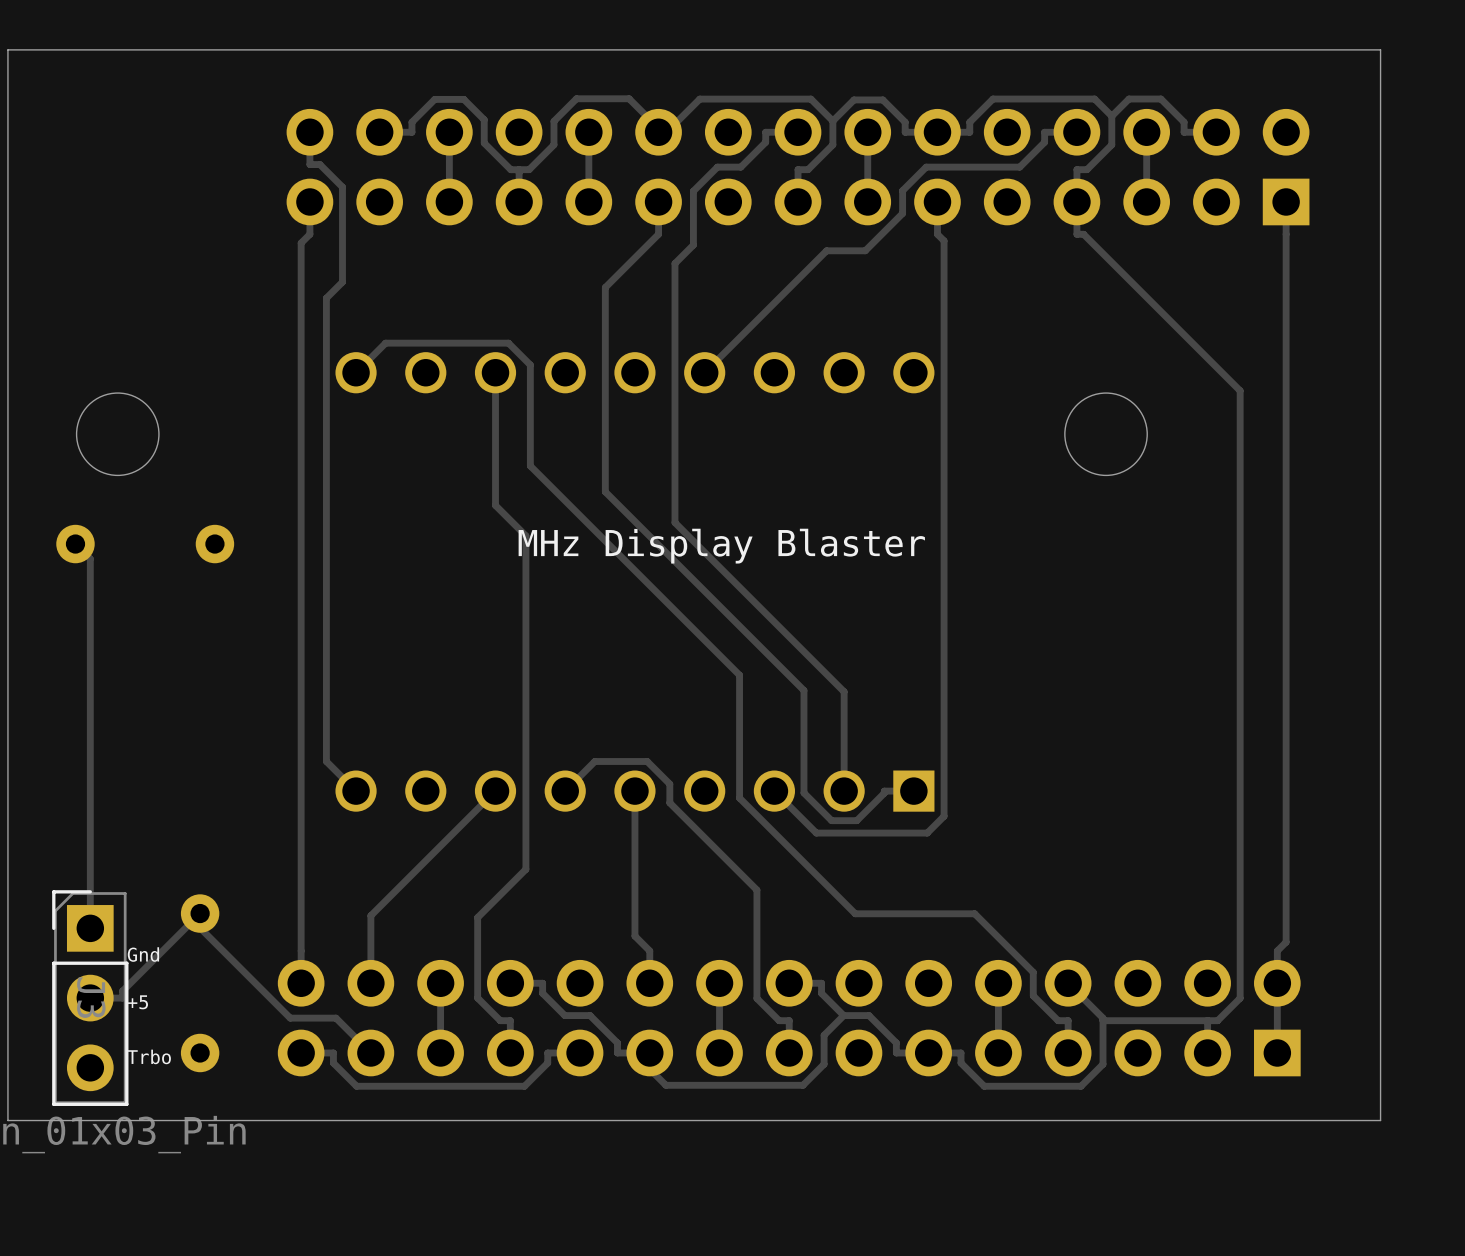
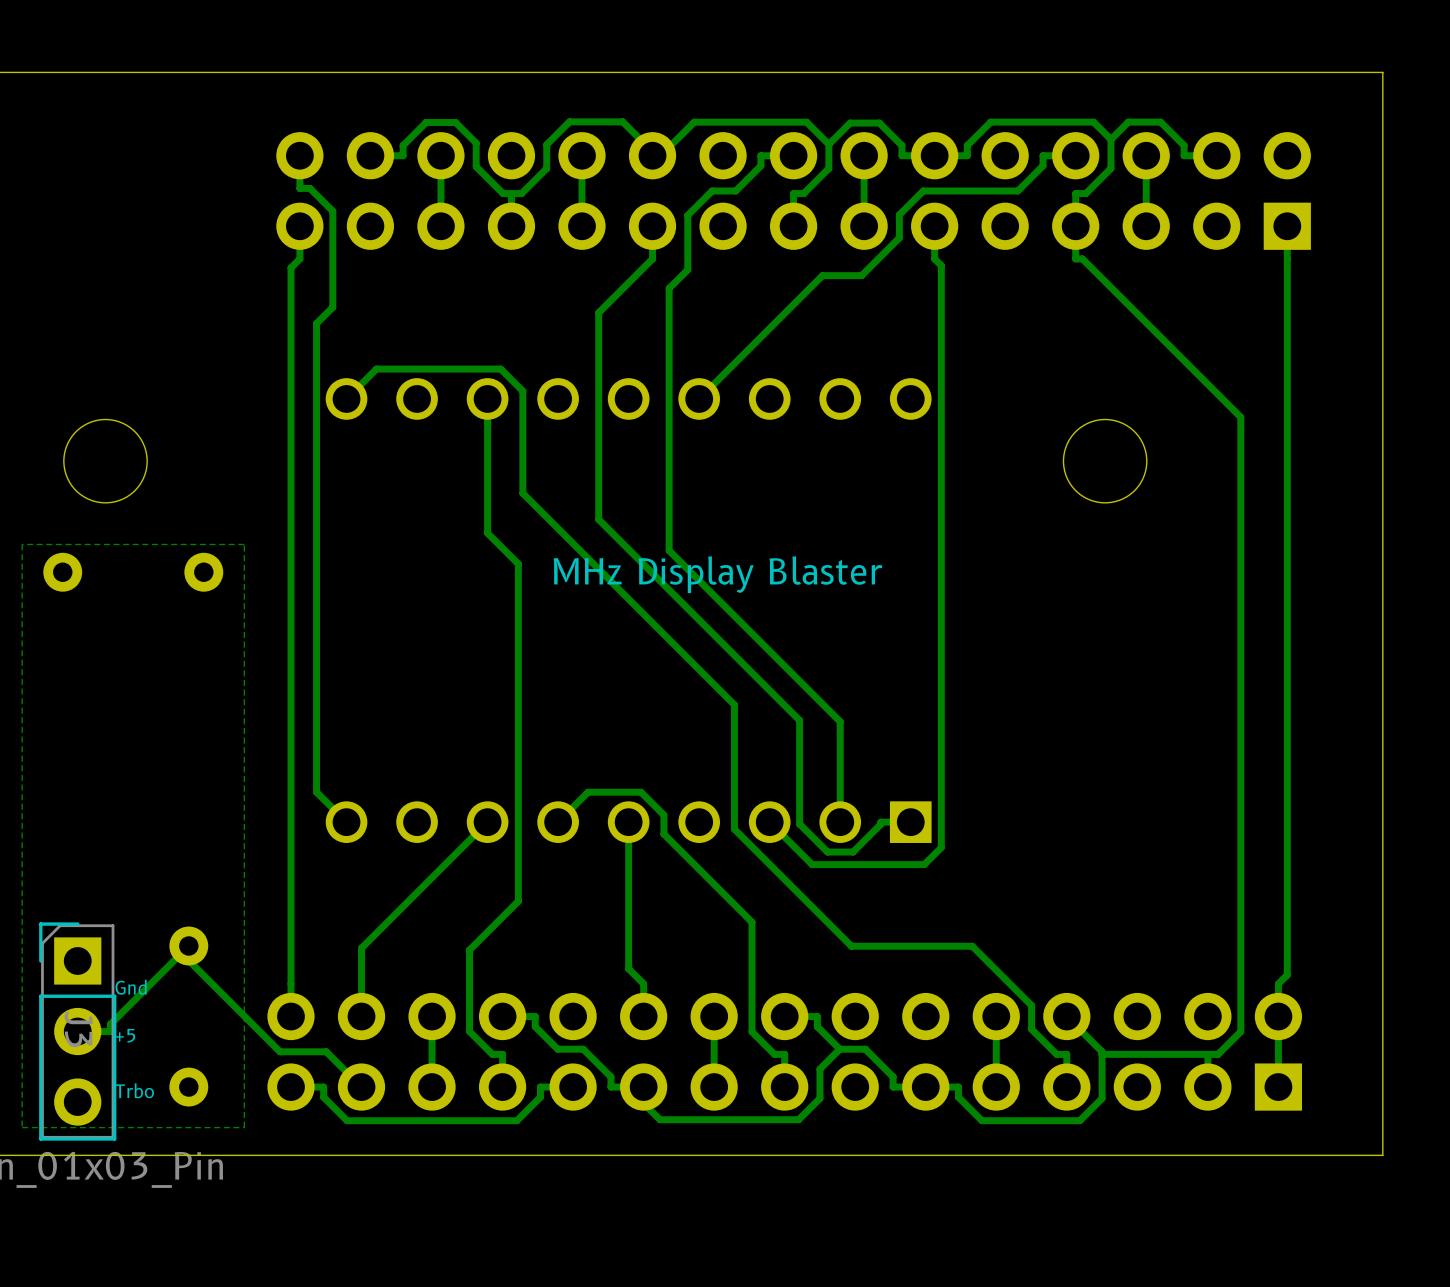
zone outline: none -> (244, 544) (22, 544) (22, 1127) (244, 1127) (244, 544)
track: (75, 544) (90, 558) (90, 928) -> none

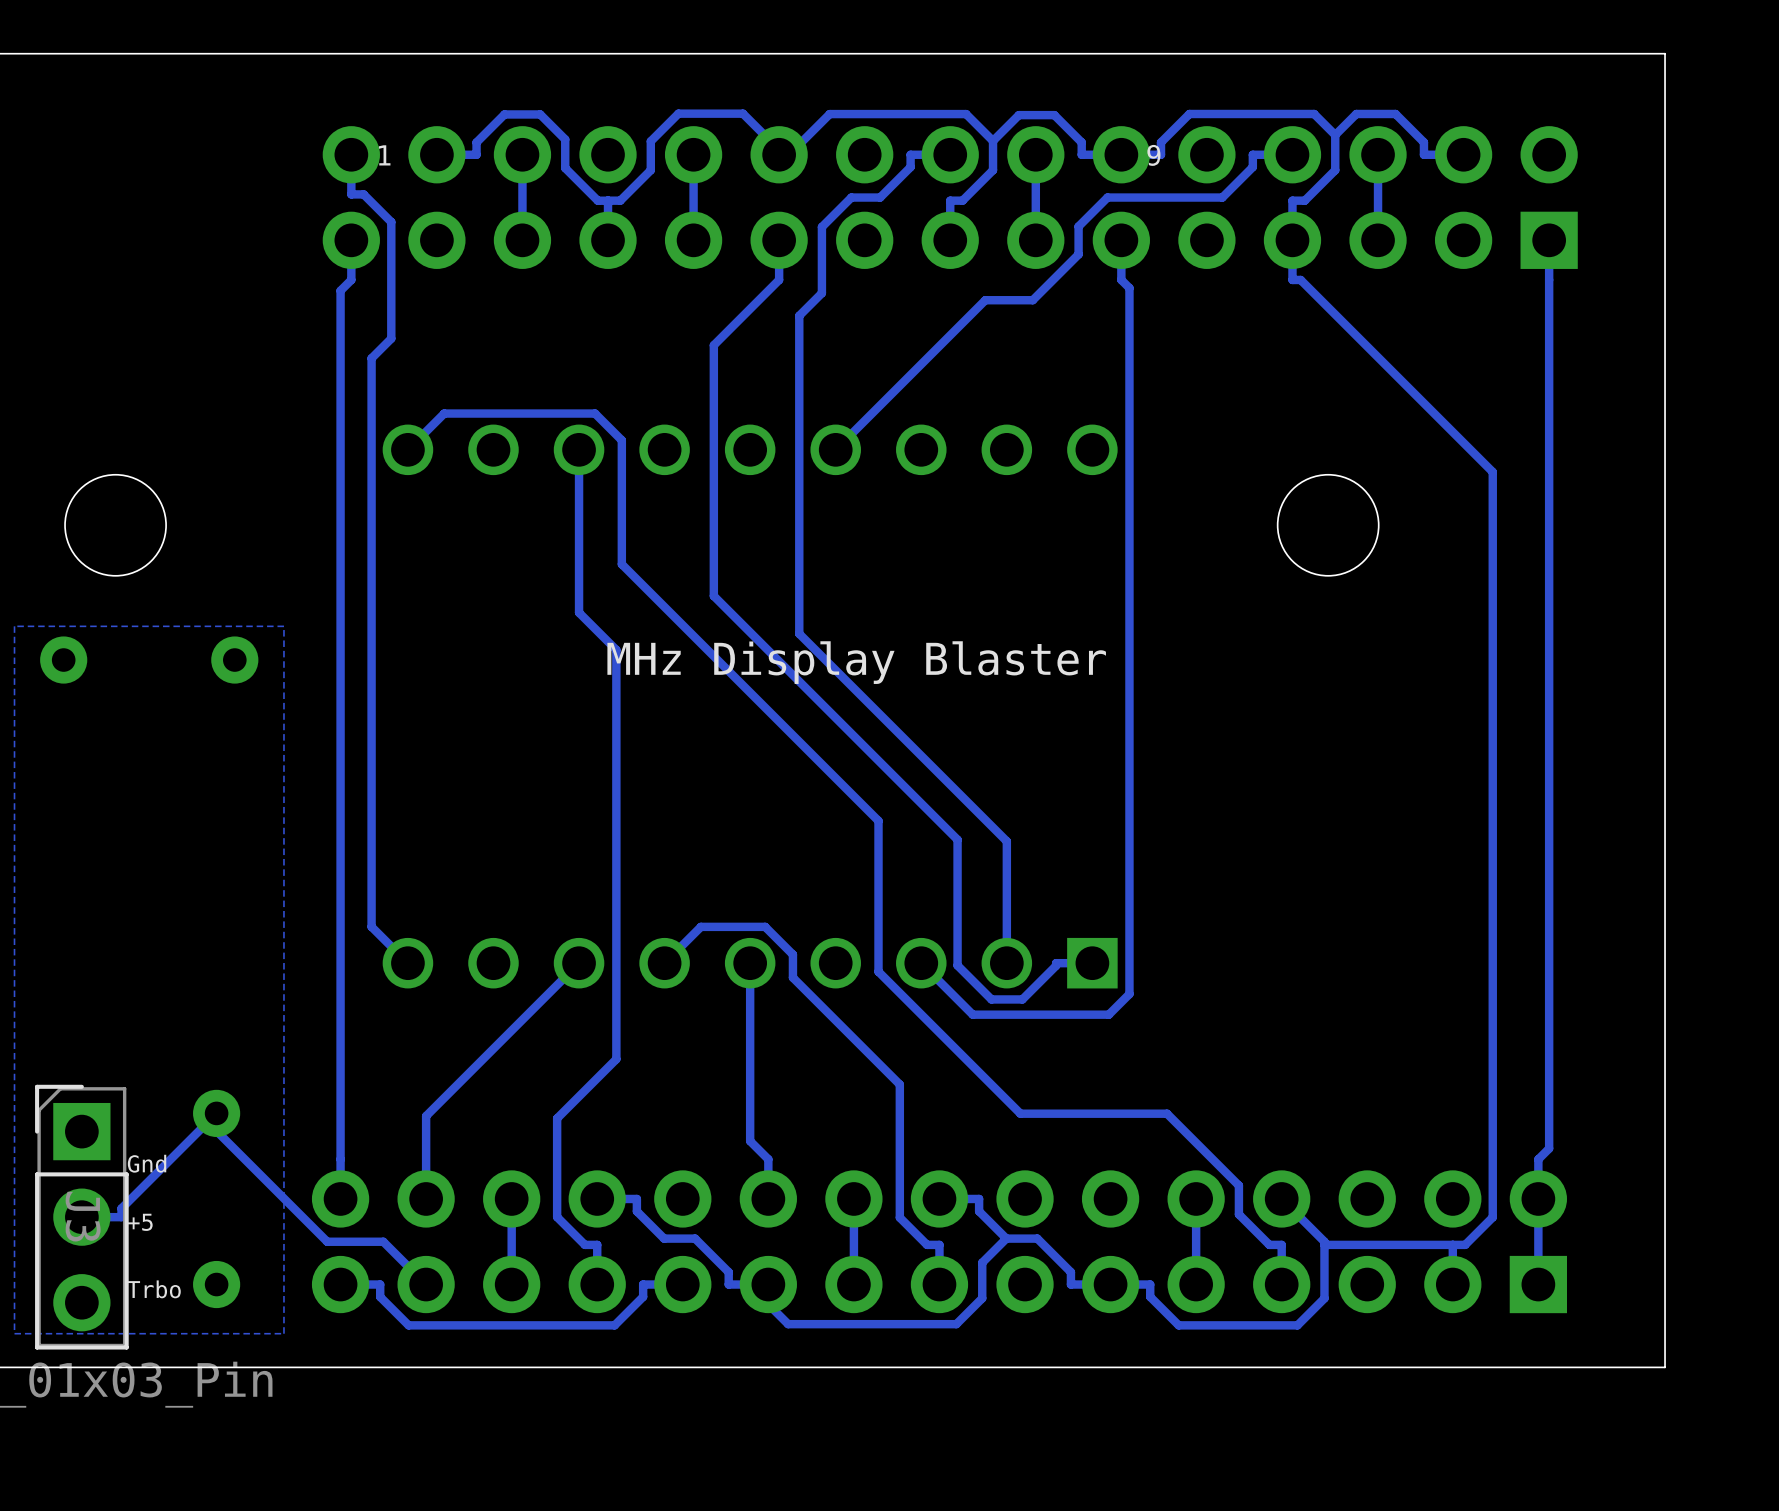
text: none -> 1 (384, 155)
text: none -> 9 (1153, 155)

